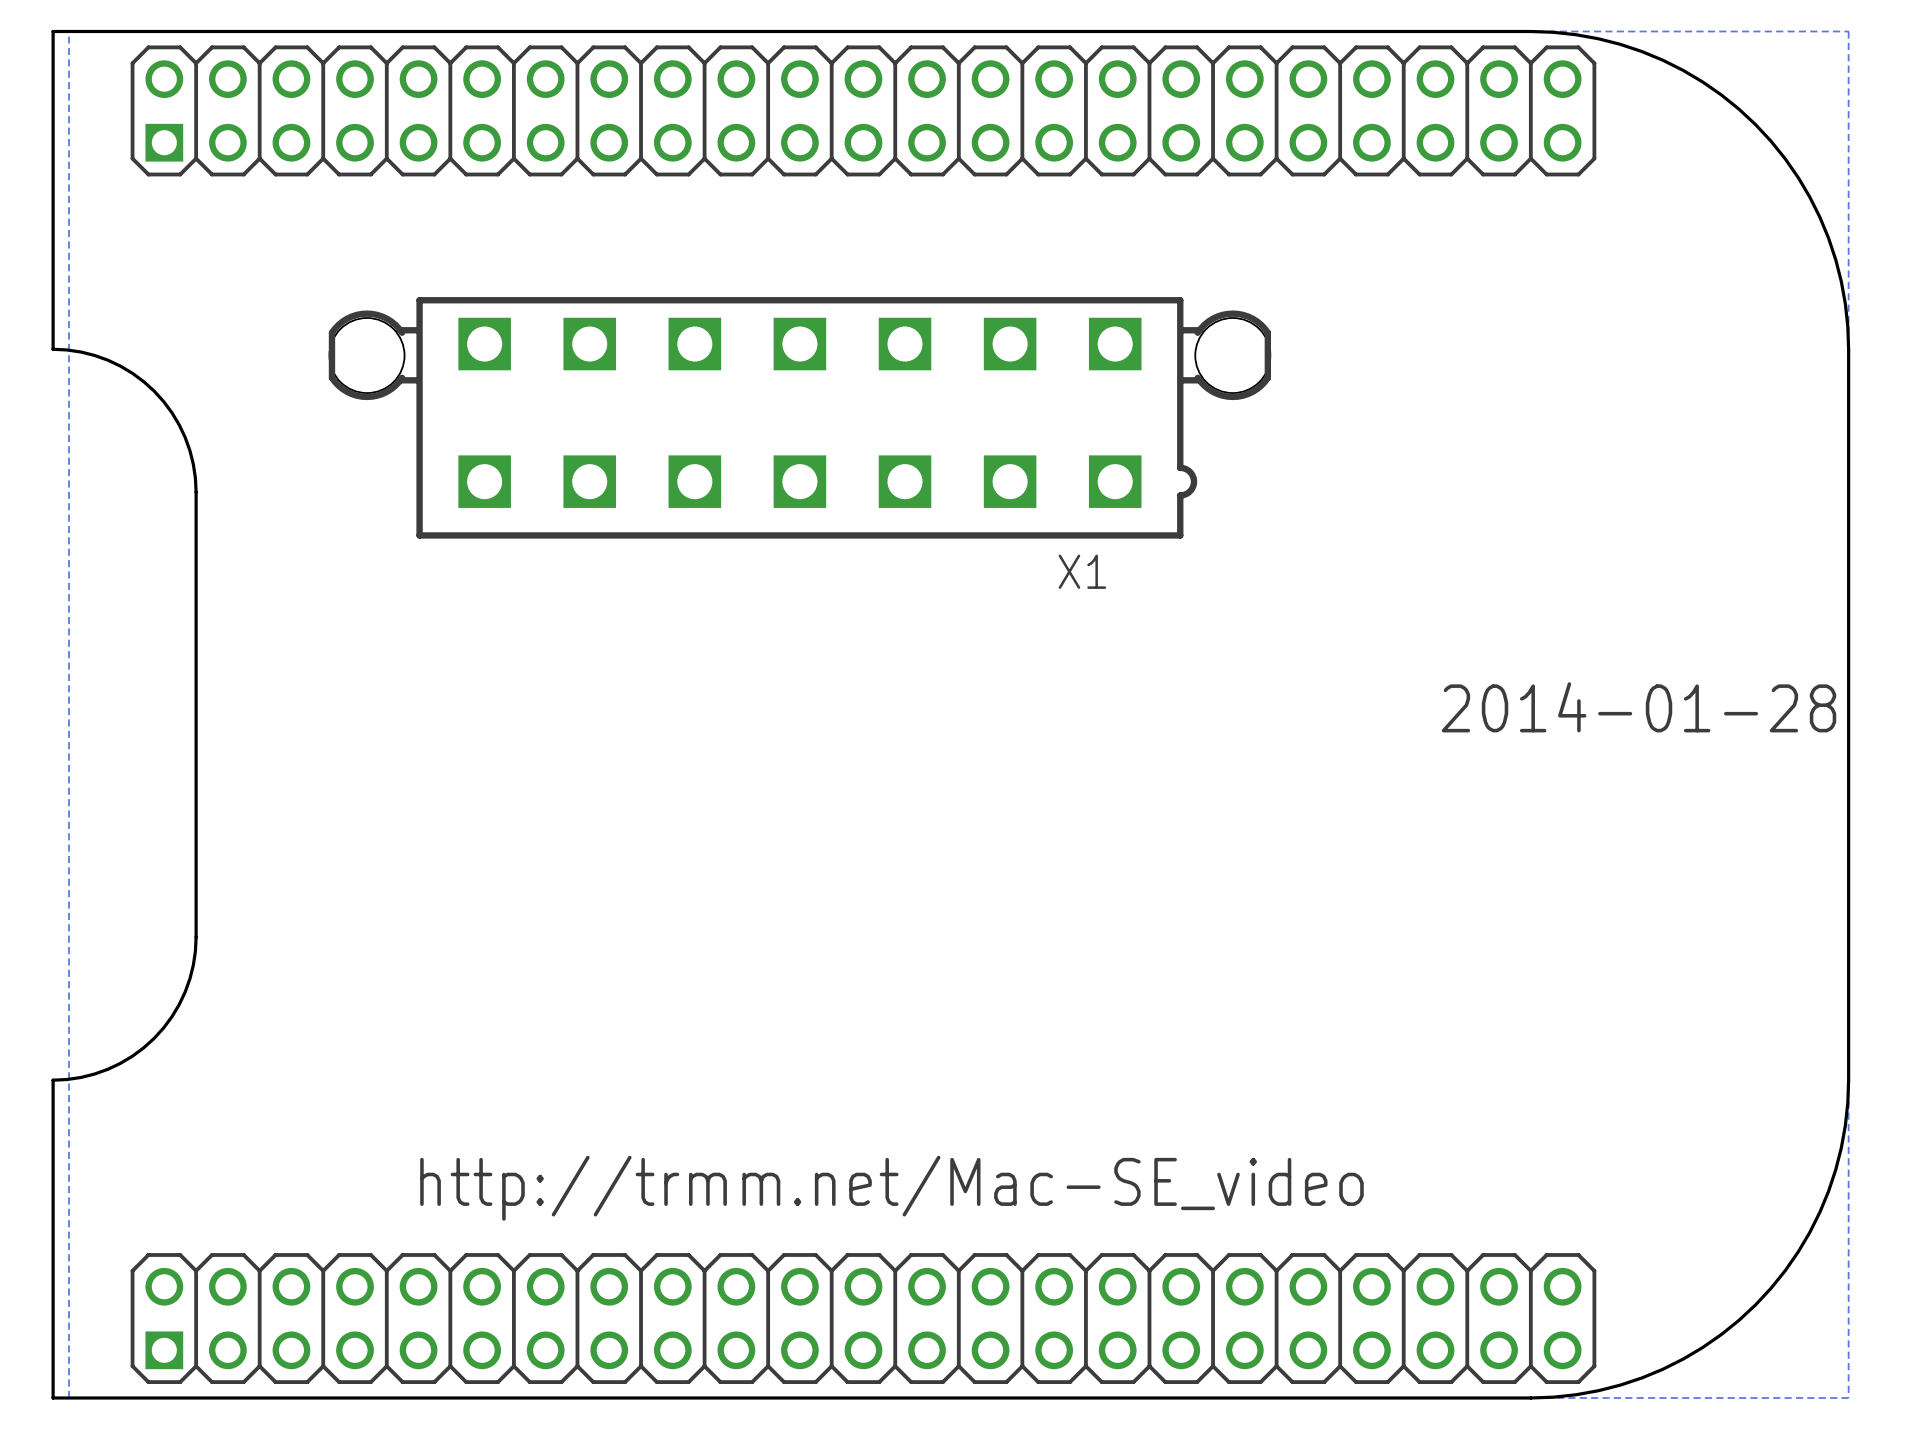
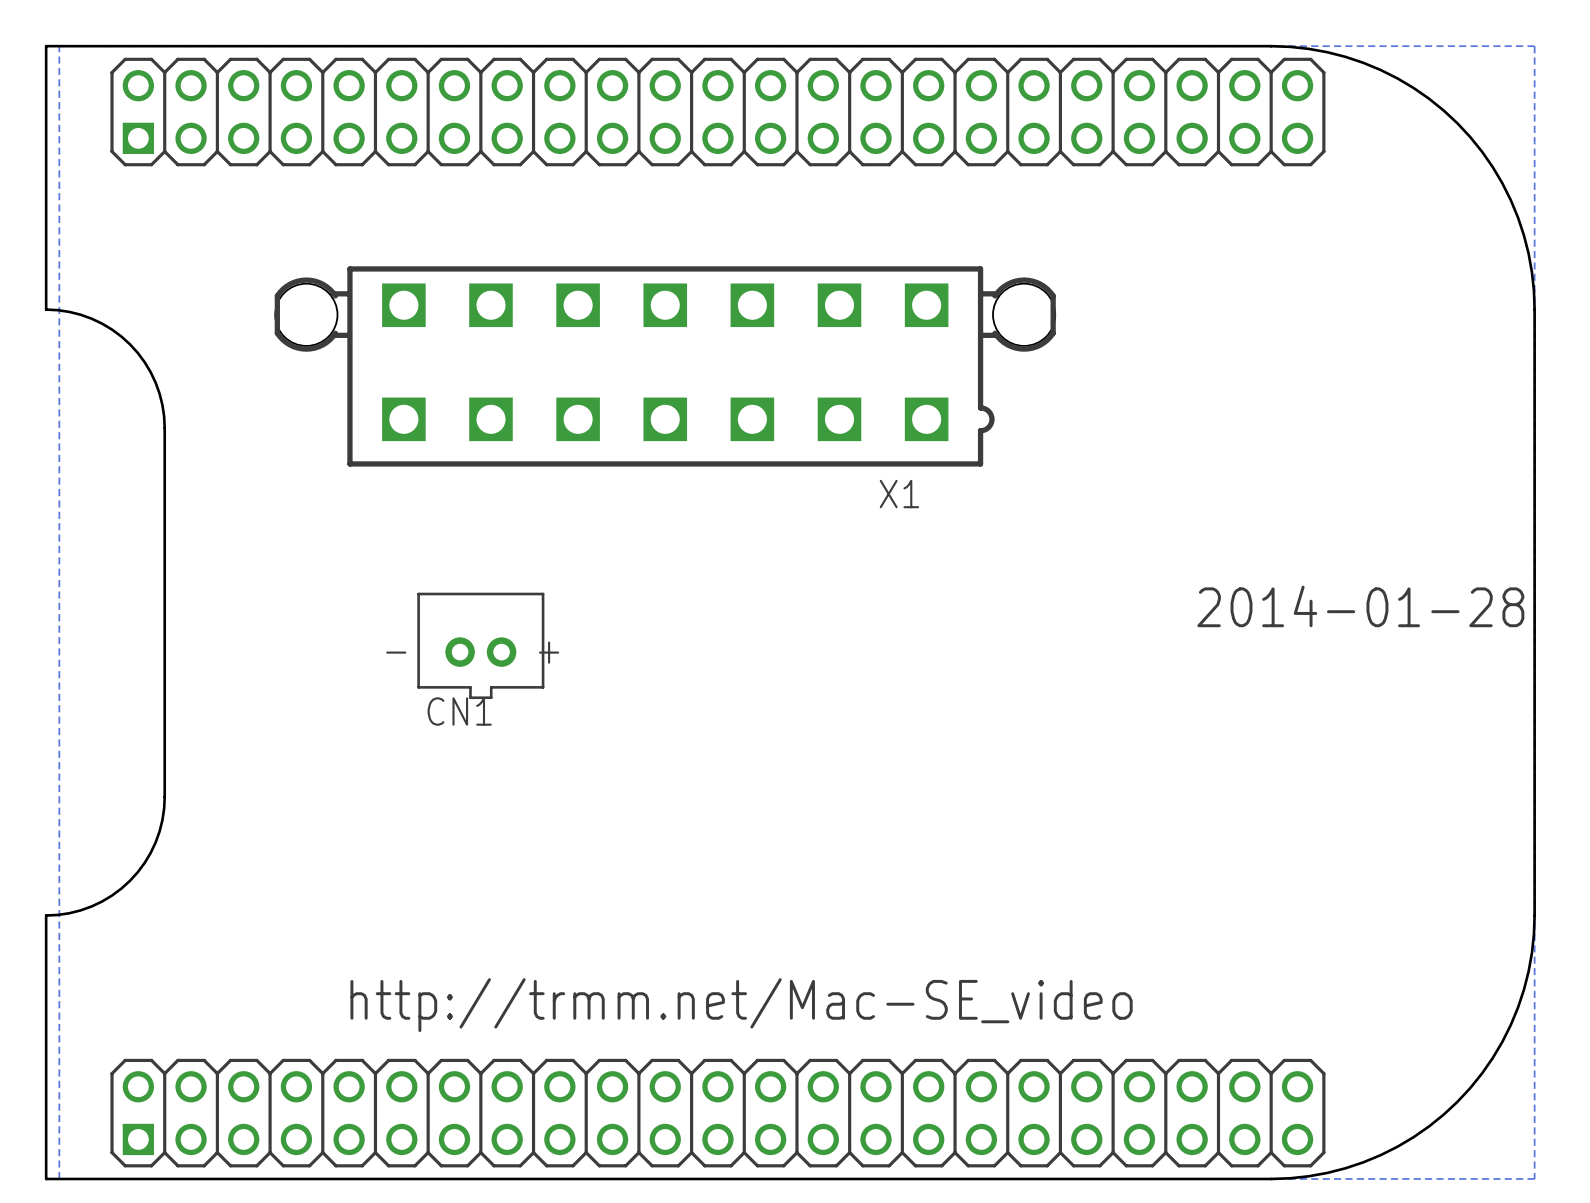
CN1: none -> (480, 645)

